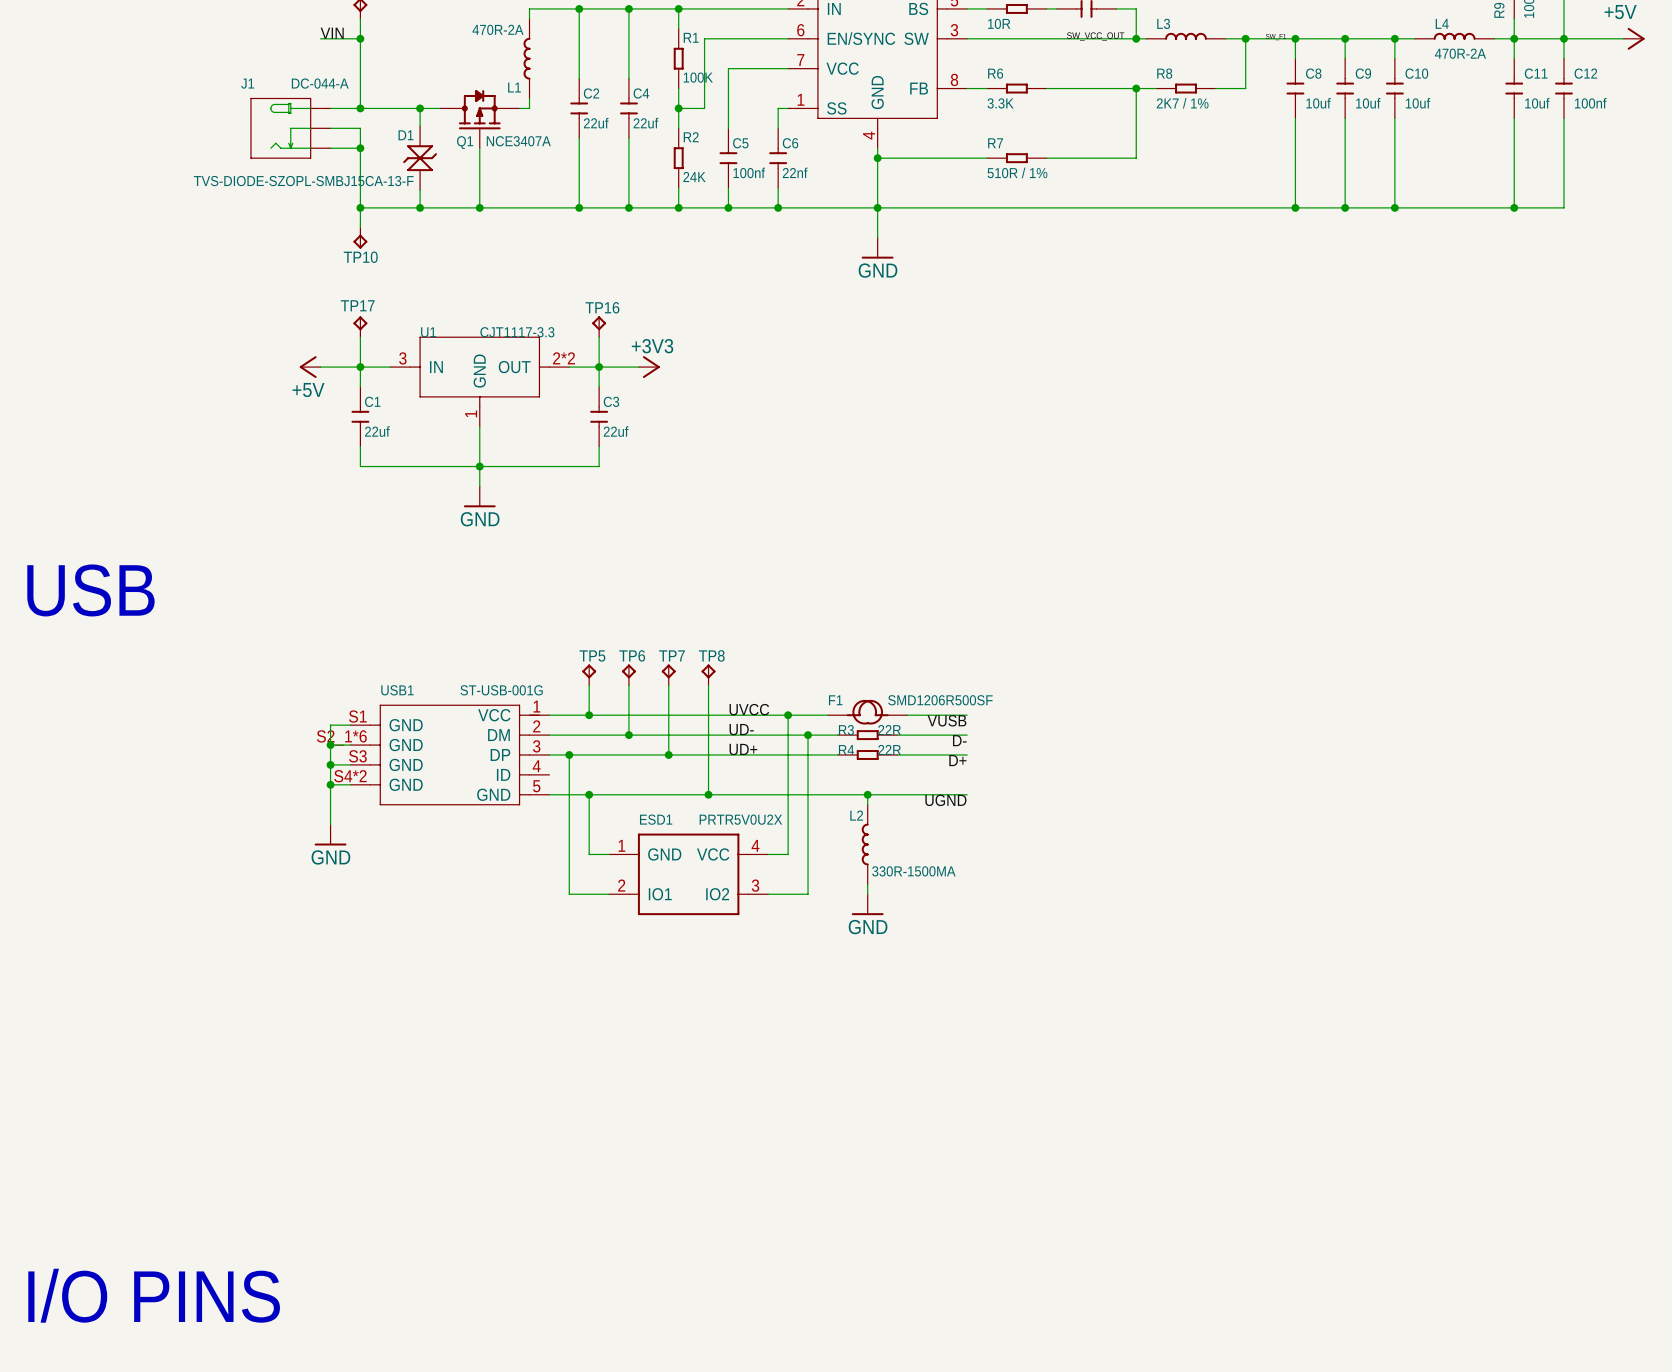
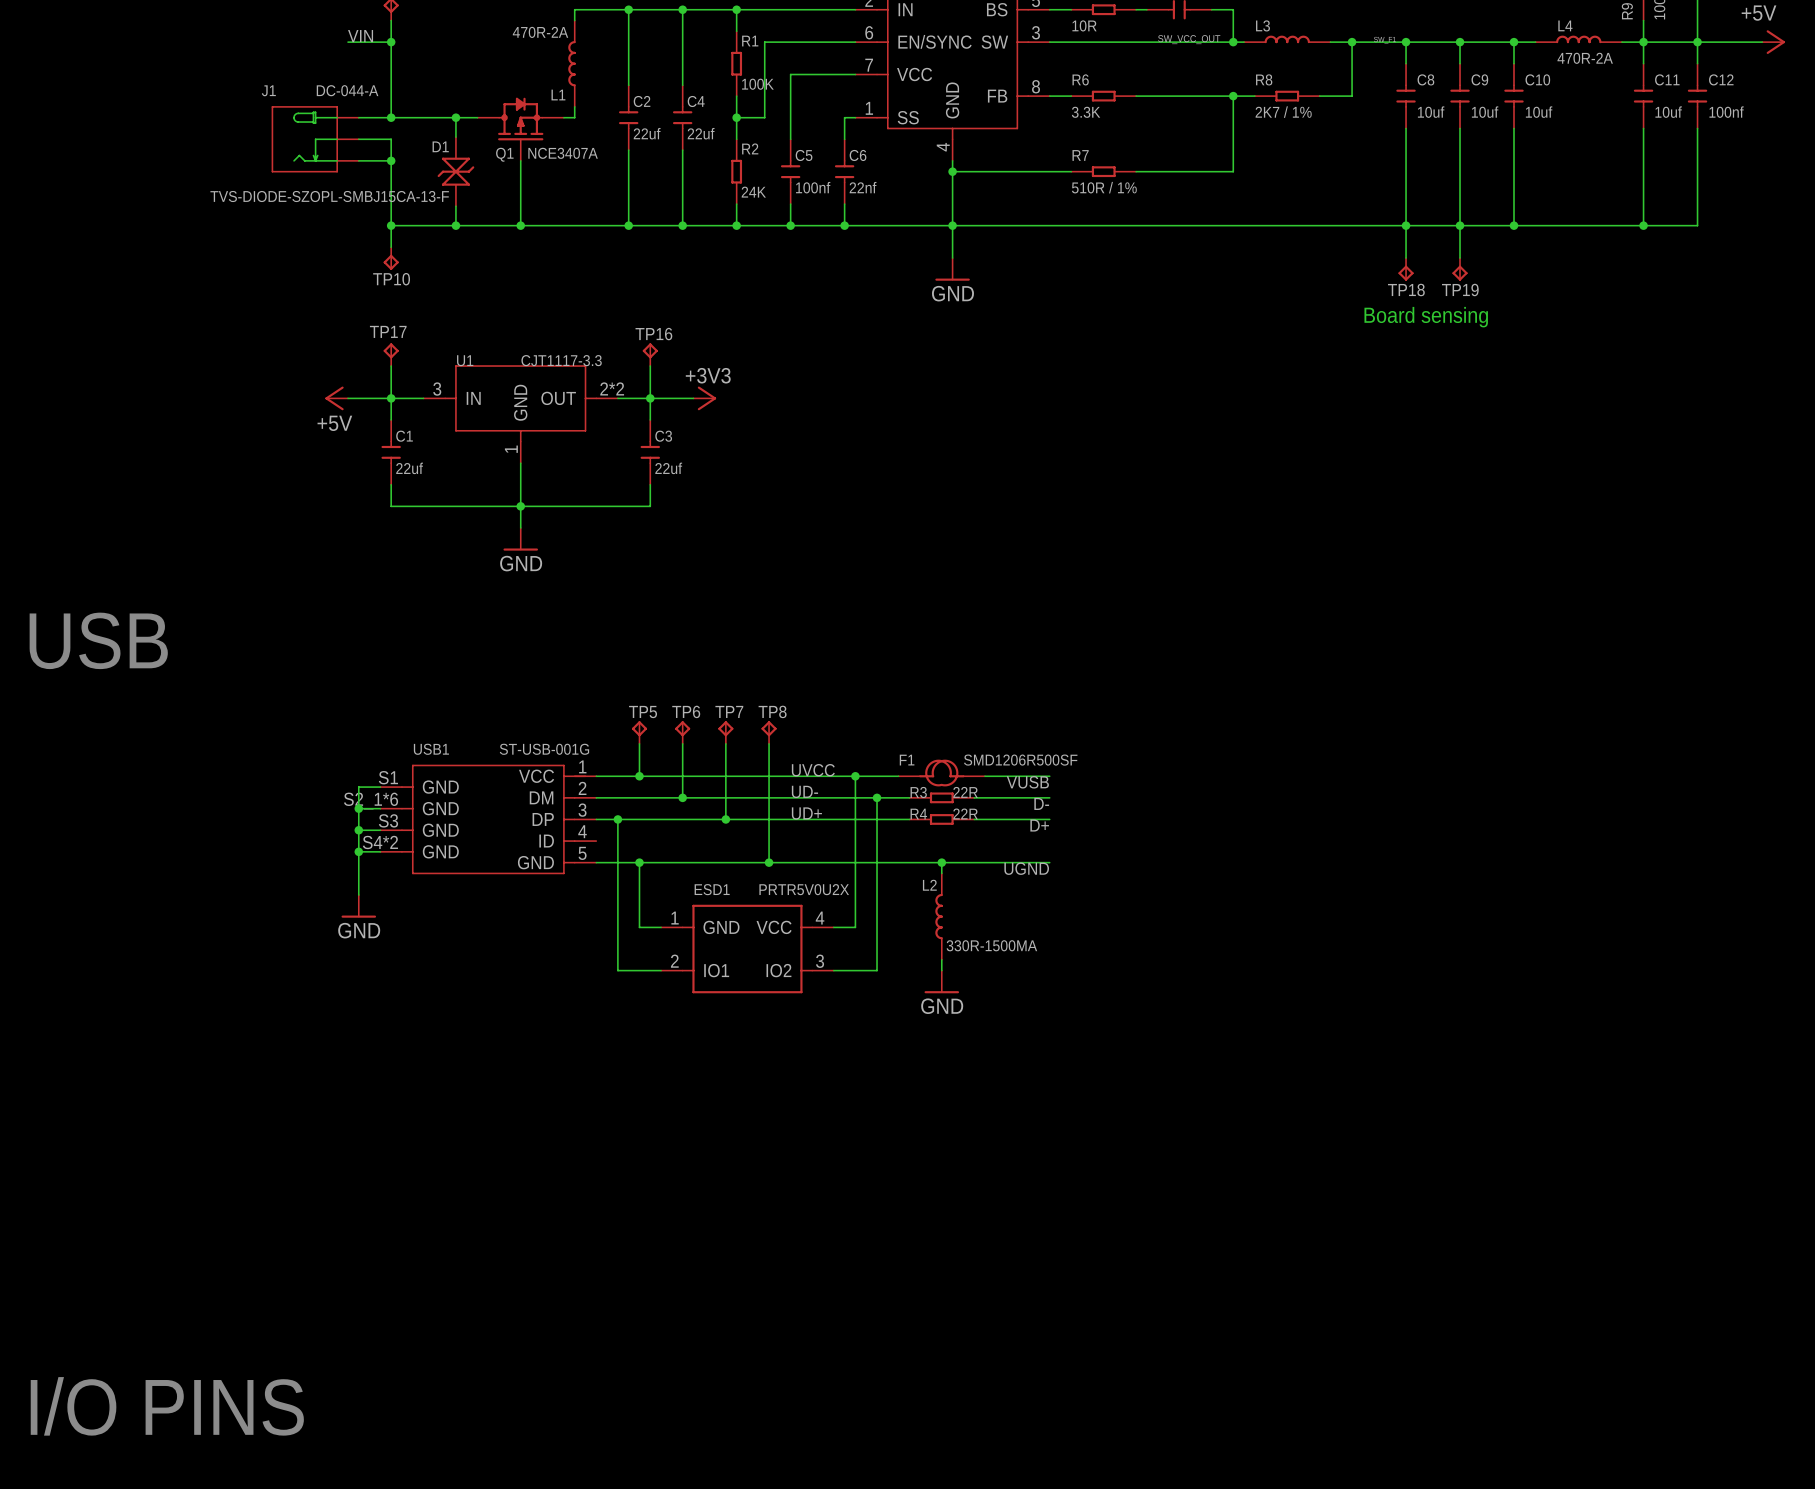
wire: none -> (1406, 225) (1406, 258)
wire: none -> (1460, 225) (1460, 258)
TP18: none -> (1406, 269)
TP19: none -> (1460, 269)
text: none -> Board sensing (1426, 317)

